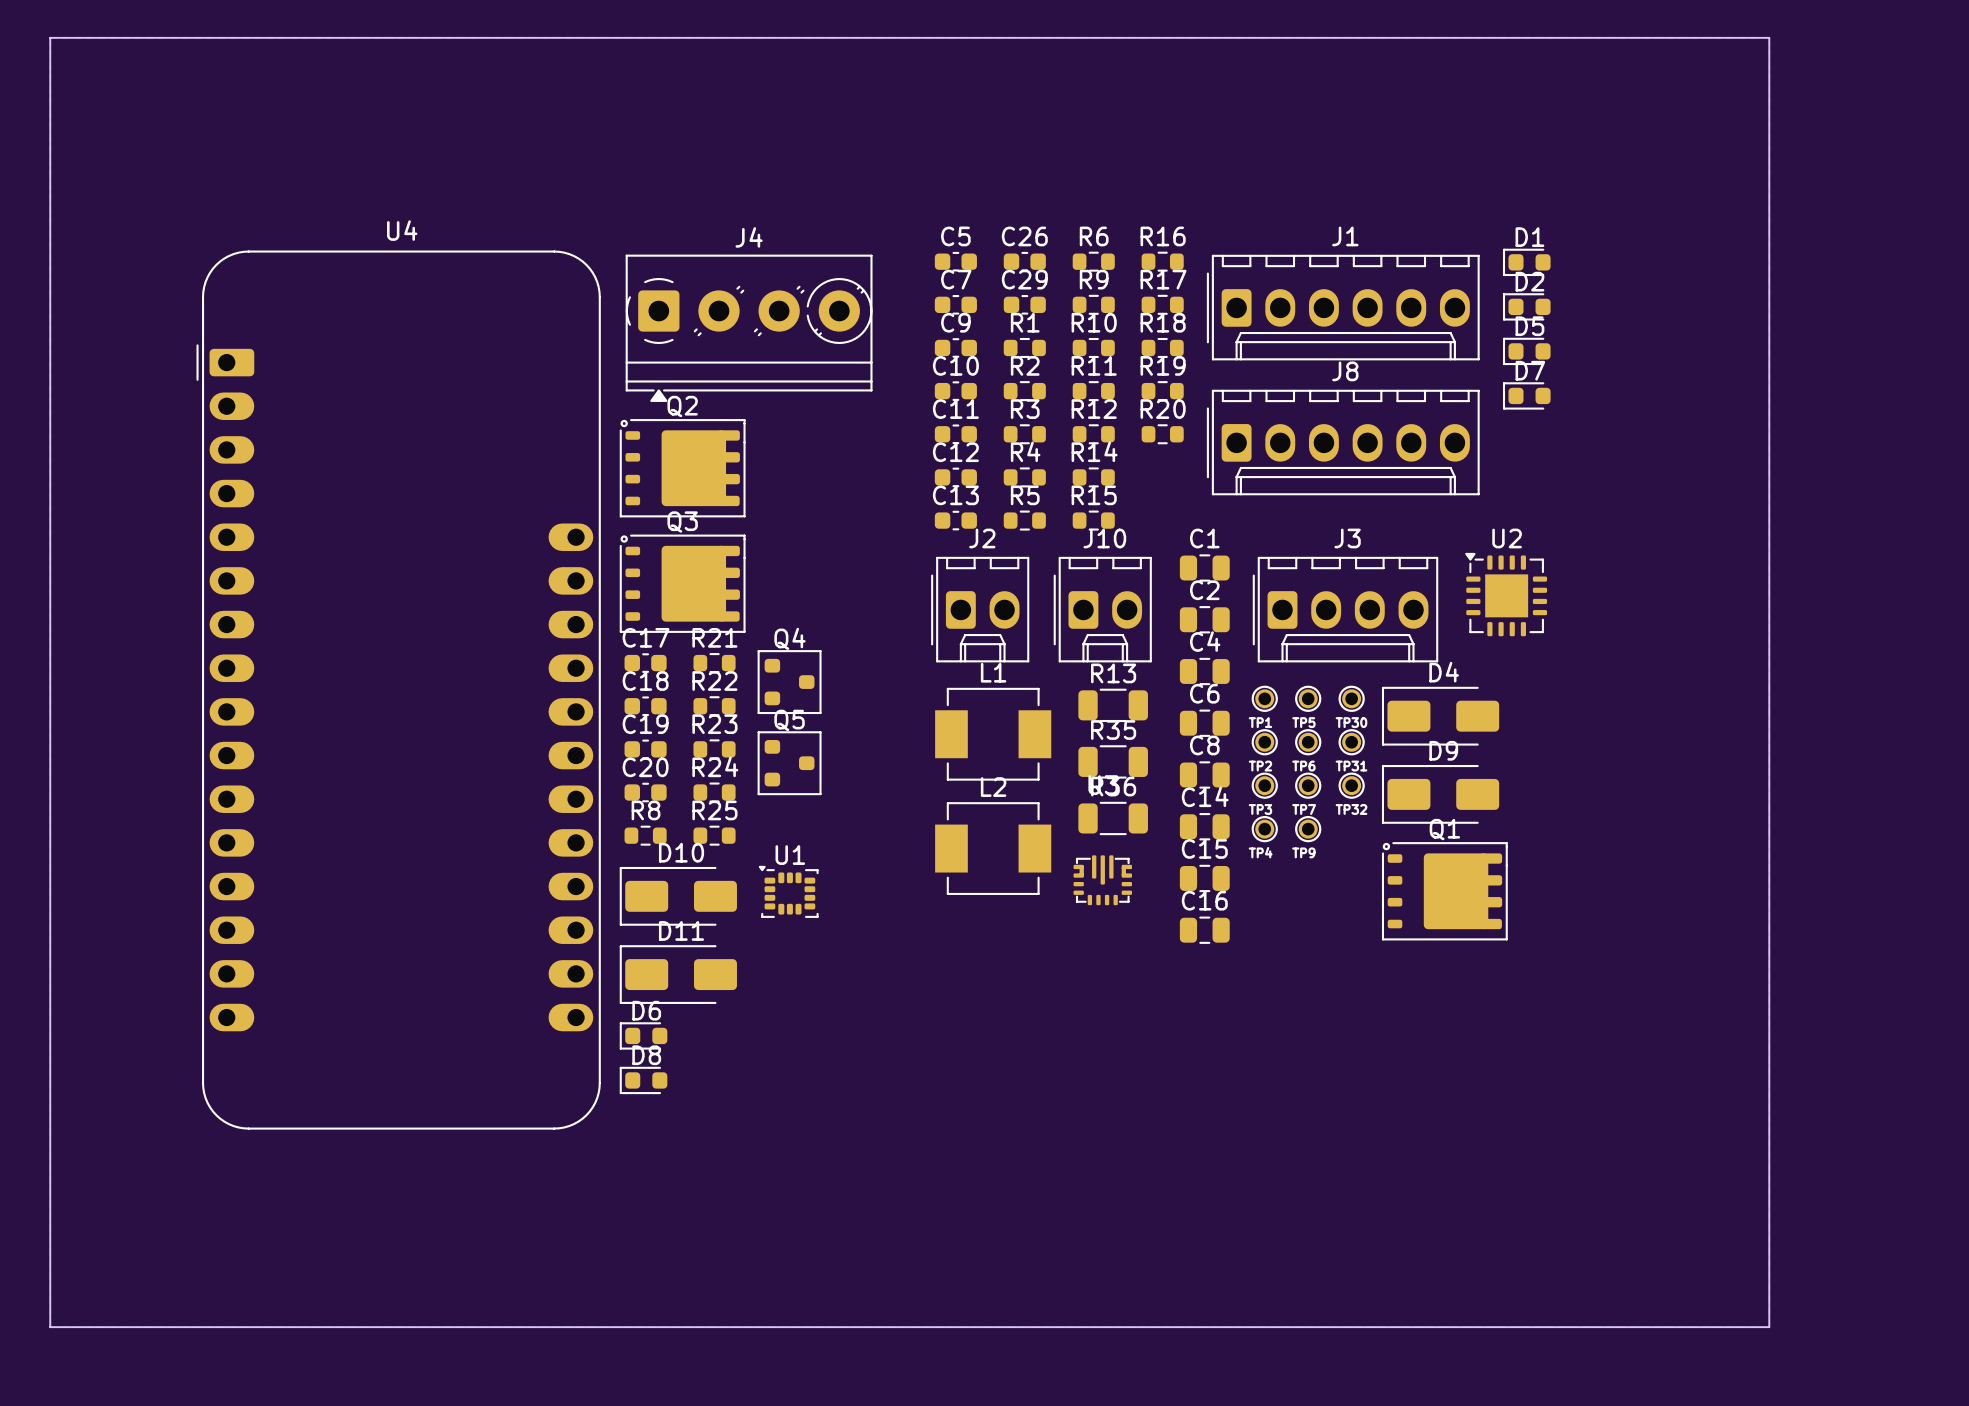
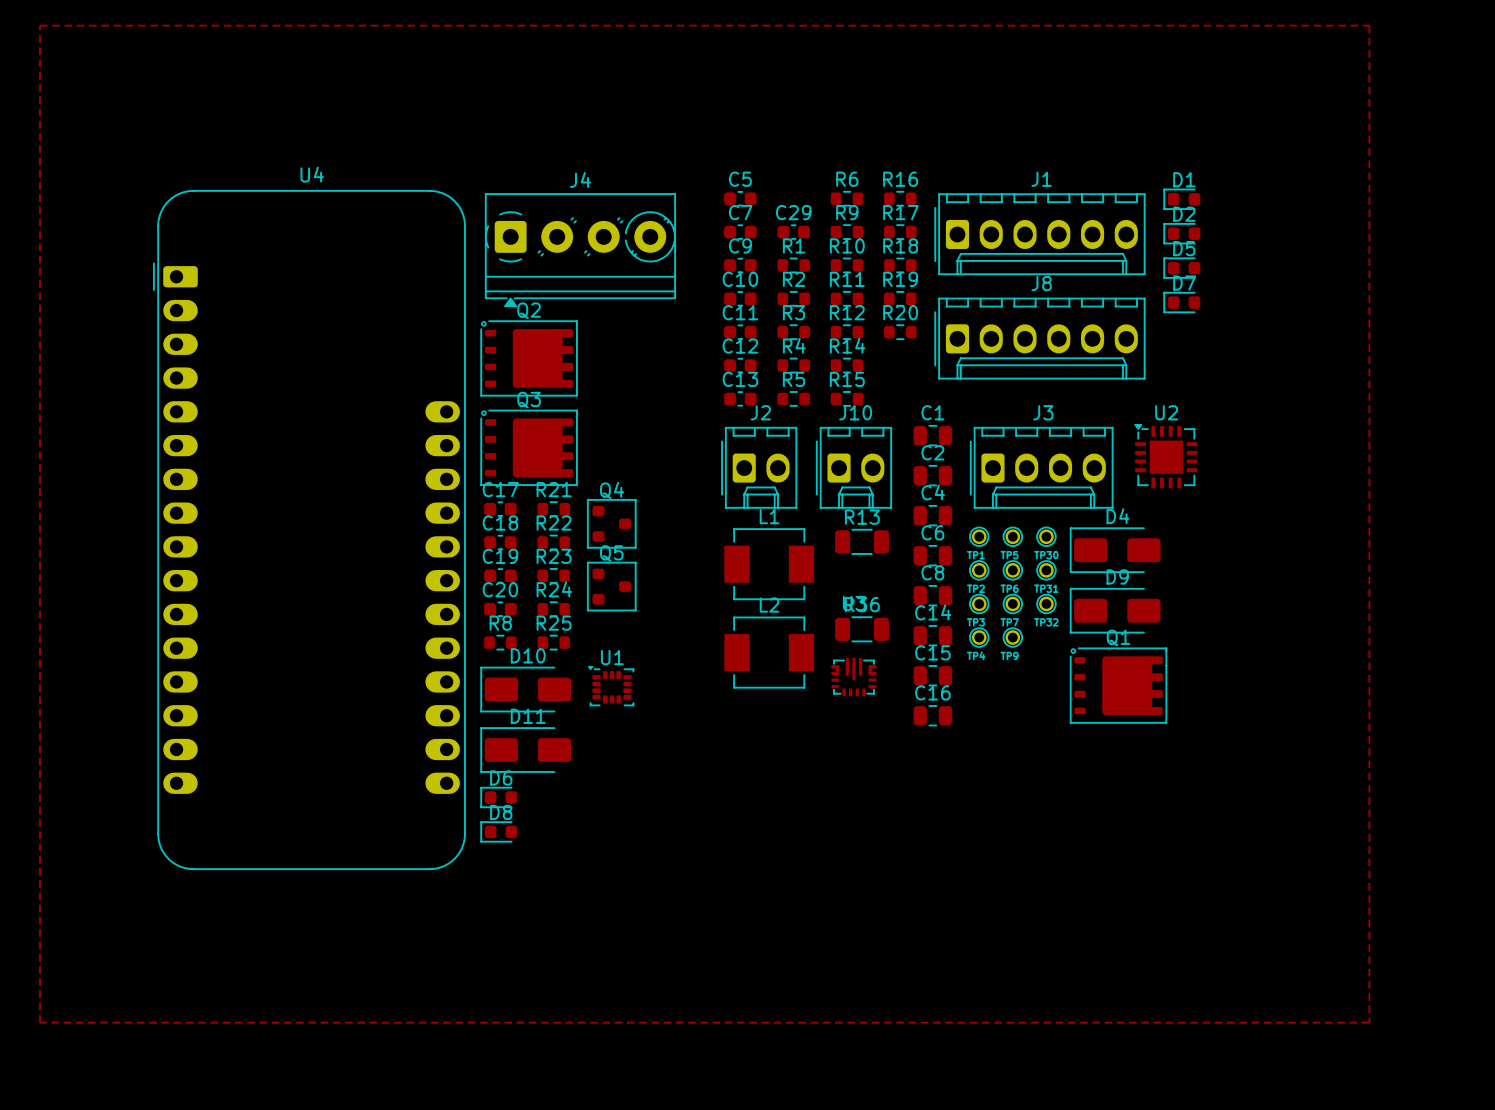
board edge: (50, 37) (1769, 37) (1769, 1327) (50, 1327) (50, 37) -> none
C26: (1024, 261) -> none
R35: (1113, 761) -> none

